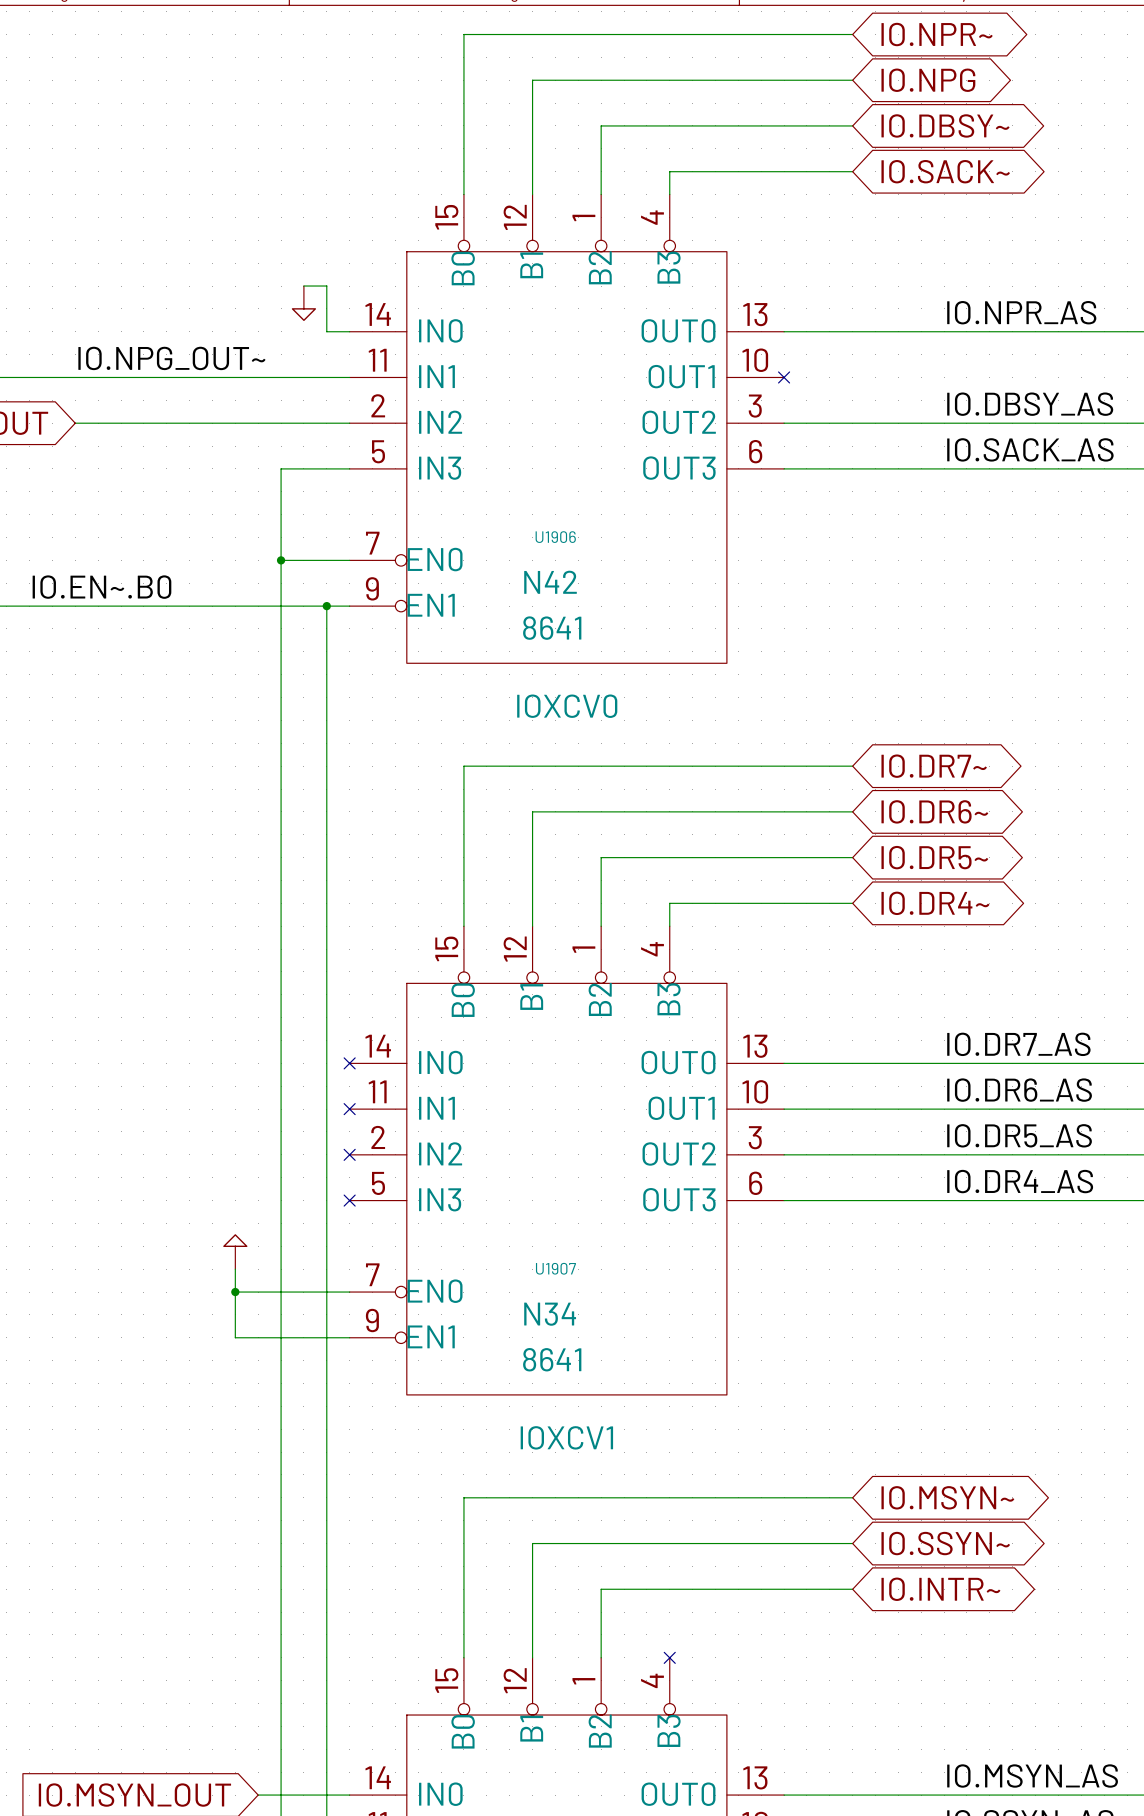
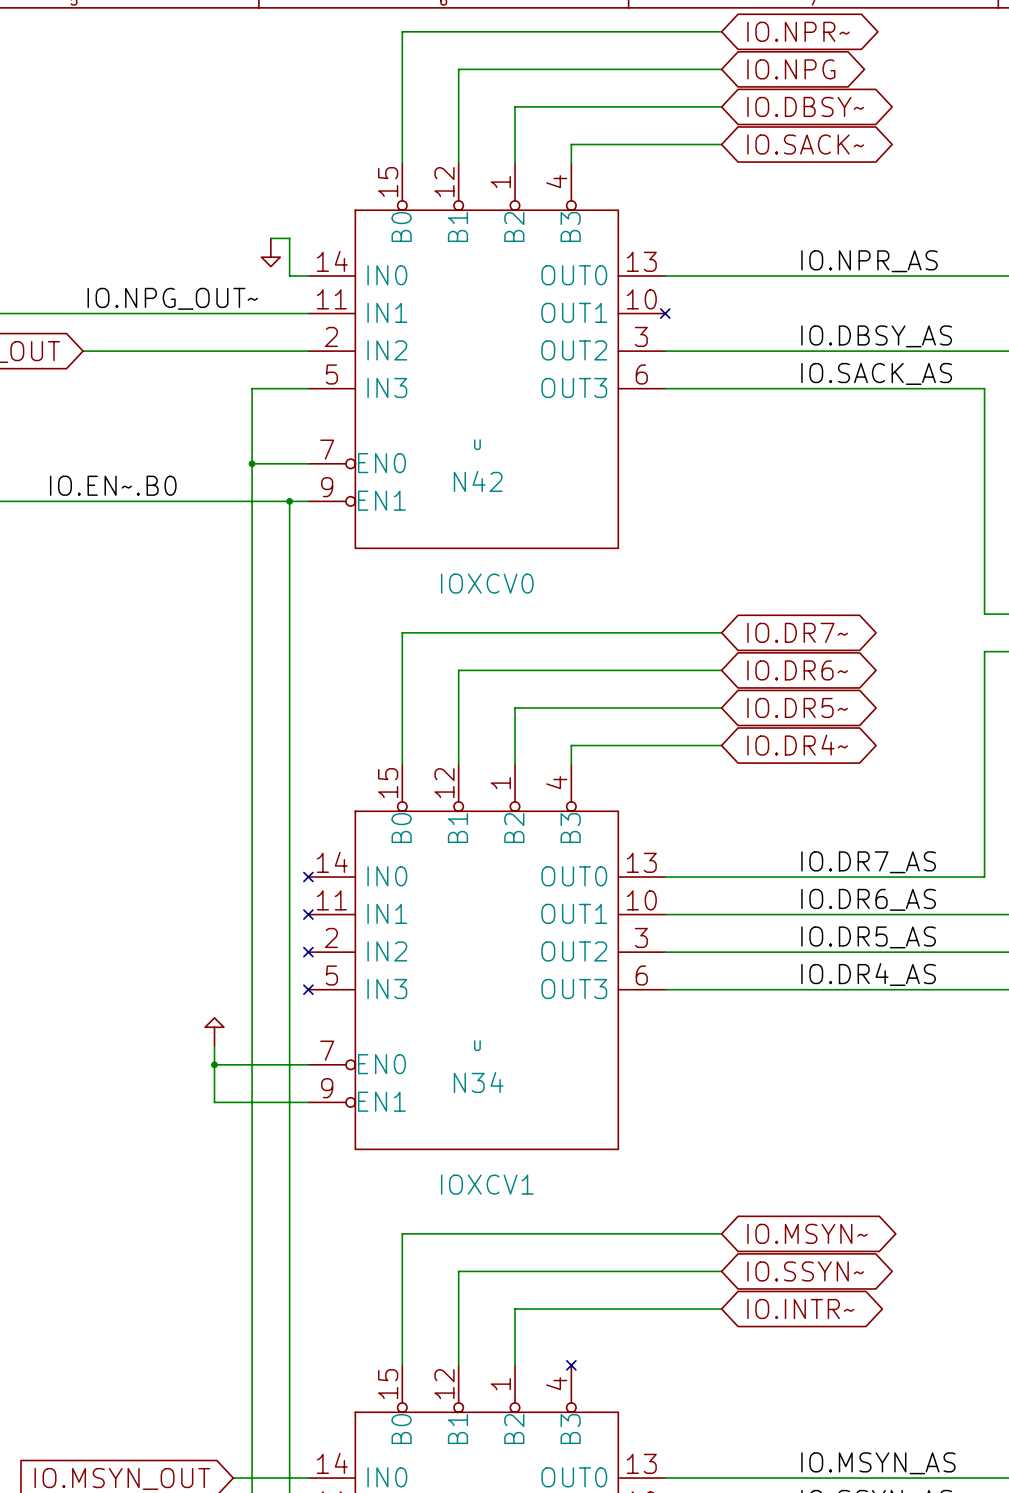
U1906 name: U1906 (555, 537) -> U (477, 444)
U1906 value: 8641 (552, 628) -> none
U1907 name: U1907 (555, 1268) -> U (477, 1045)
U1907 value: 8641 (552, 1359) -> none

